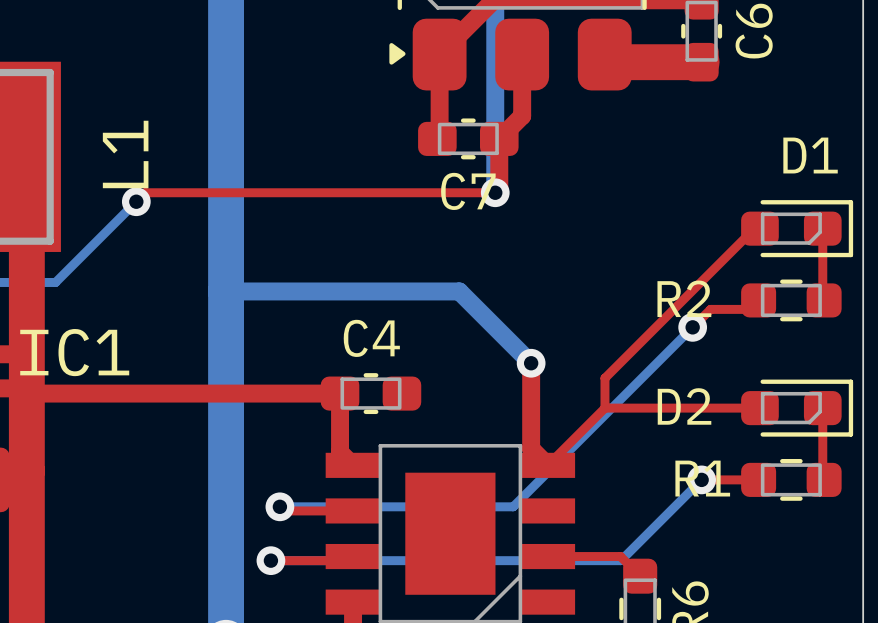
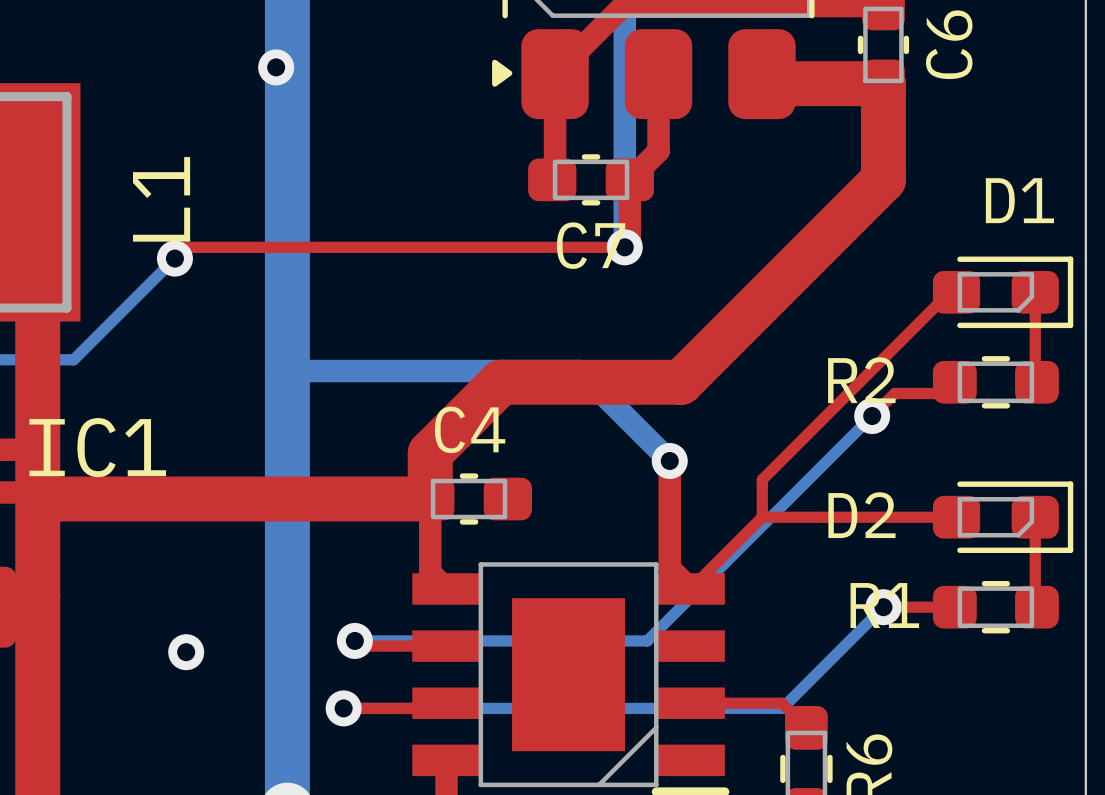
via: none -> (276, 67)
top track: none -> (883, 83) (883, 179) (681, 382) (501, 382) (430, 453) (430, 499)
top track width: thin (30, 393) (340, 393) -> thick (42, 499) (430, 499)
via: none -> (186, 652)

